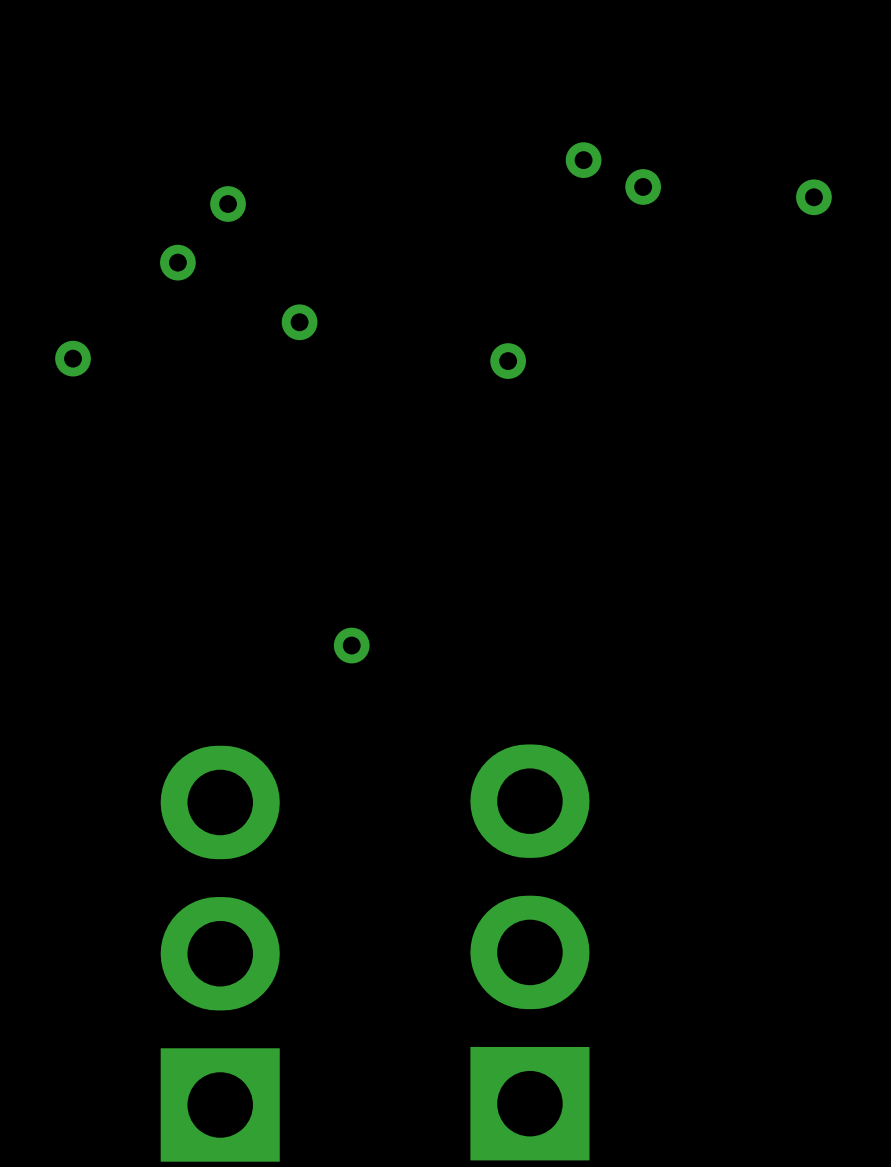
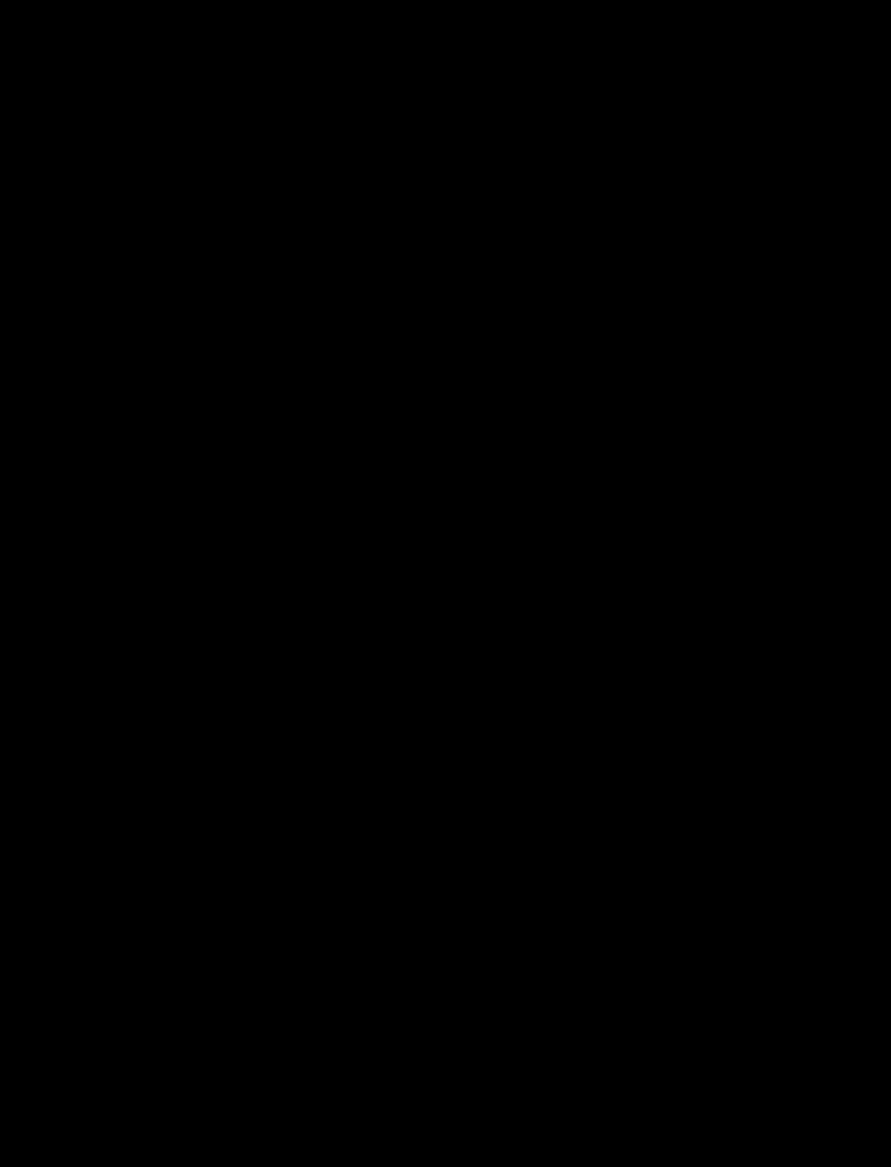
via: (583, 160) -> none
via: (643, 186) -> none
via: (813, 197) -> none
via: (228, 204) -> none
via: (177, 262) -> none
via: (299, 322) -> none
via: (73, 358) -> none
via: (508, 361) -> none
via: (351, 645) -> none
part: (529, 952) -> none
part: (220, 953) -> none

